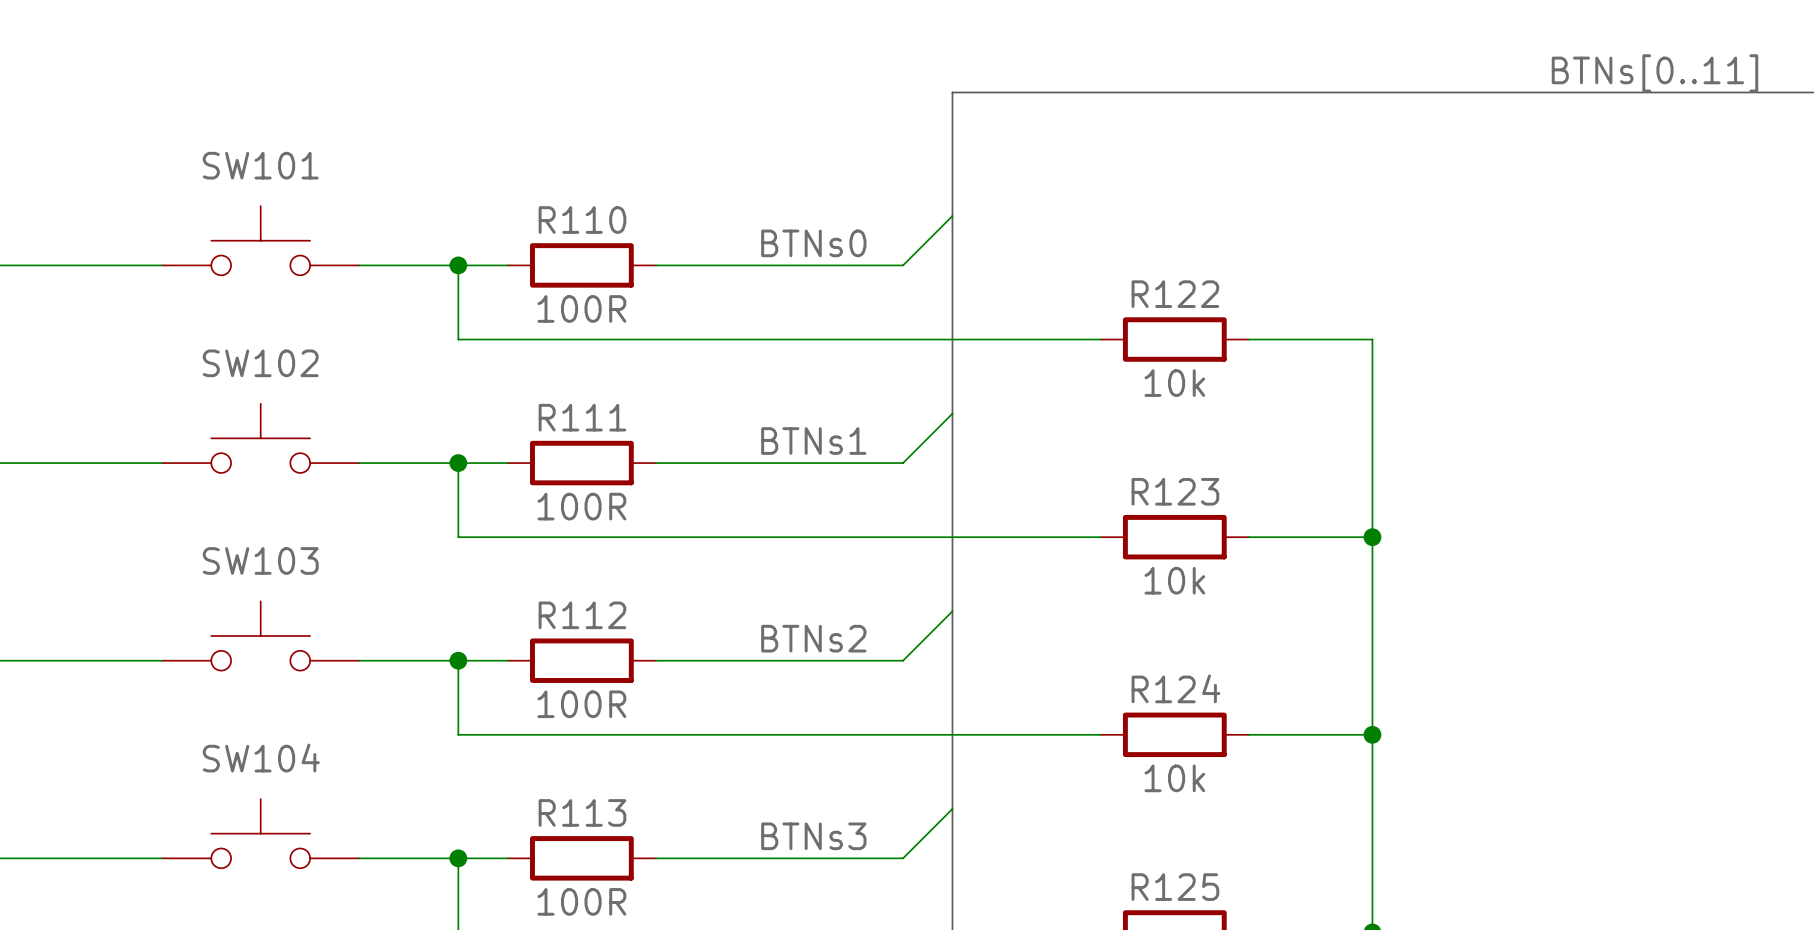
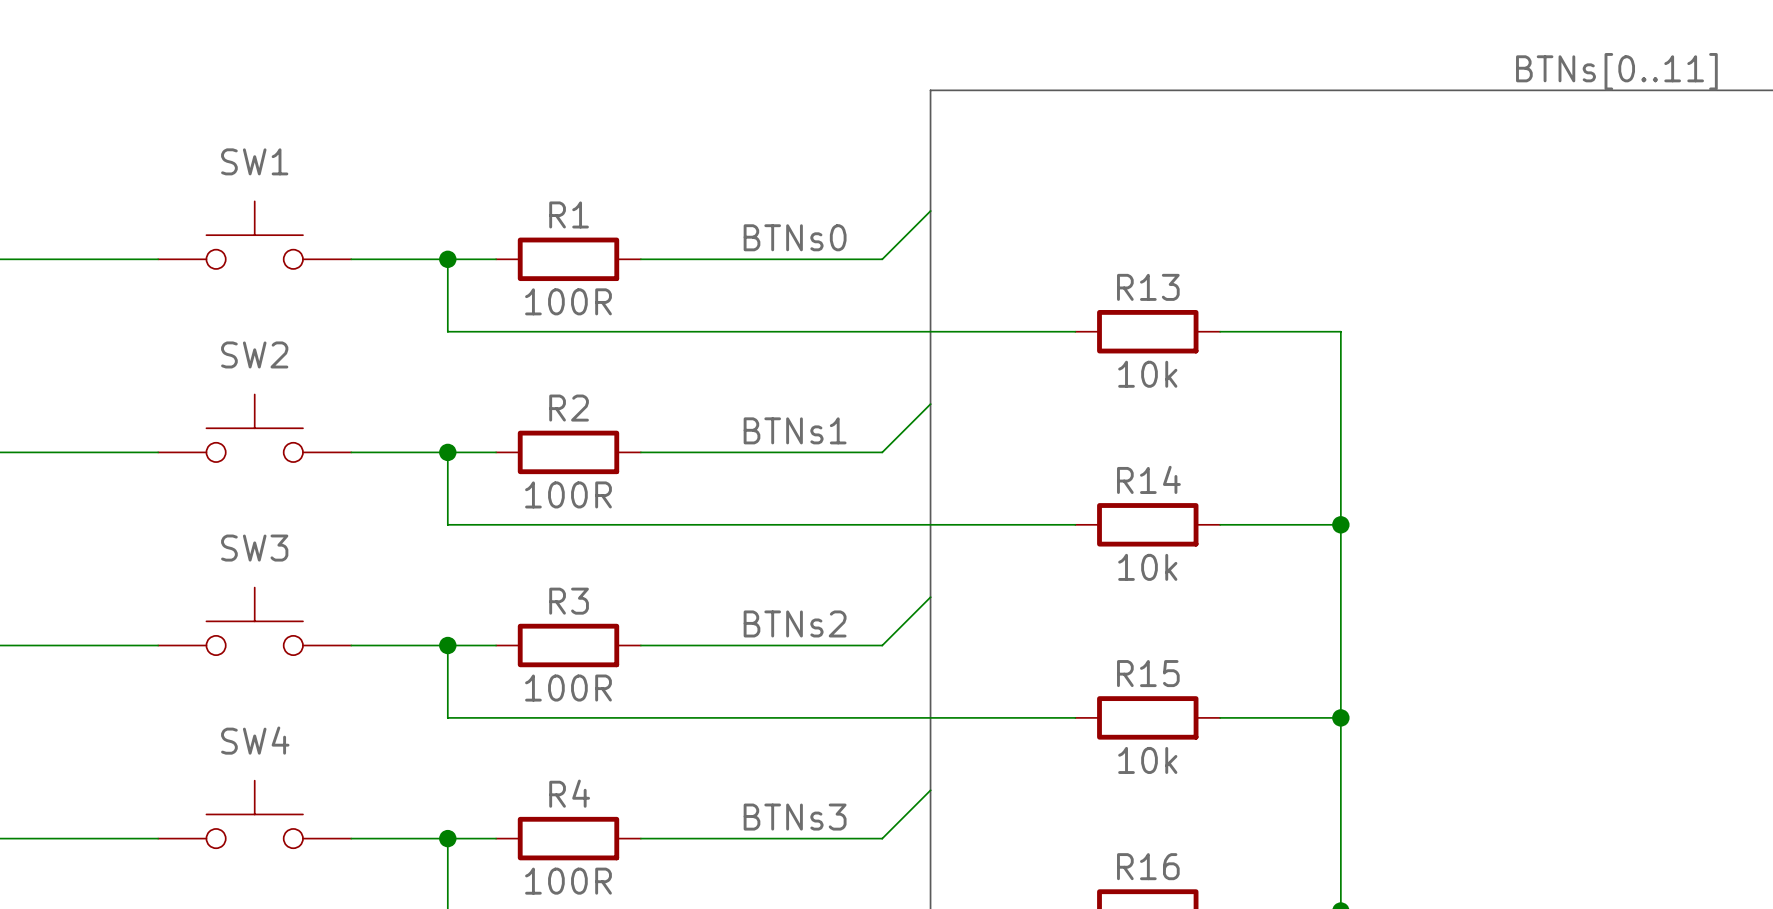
SW101 name: SW101 (260, 165) -> SW1 (254, 161)
R110 name: R110 (582, 220) -> R1 (569, 214)
R122 name: R122 (1175, 294) -> R13 (1148, 287)
SW102 name: SW102 (260, 363) -> SW2 (254, 354)
R111 name: R111 (582, 417) -> R2 (569, 408)
R123 name: R123 (1175, 491) -> R14 (1148, 479)
SW103 name: SW103 (260, 560) -> SW3 (254, 548)
R112 name: R112 (582, 615) -> R3 (569, 601)
R124 name: R124 (1175, 688) -> R15 (1148, 673)
SW104 name: SW104 (261, 758) -> SW4 (255, 740)
R113 name: R113 (582, 812) -> R4 (569, 793)
R125 name: R125 (1175, 887) -> R16 (1148, 866)

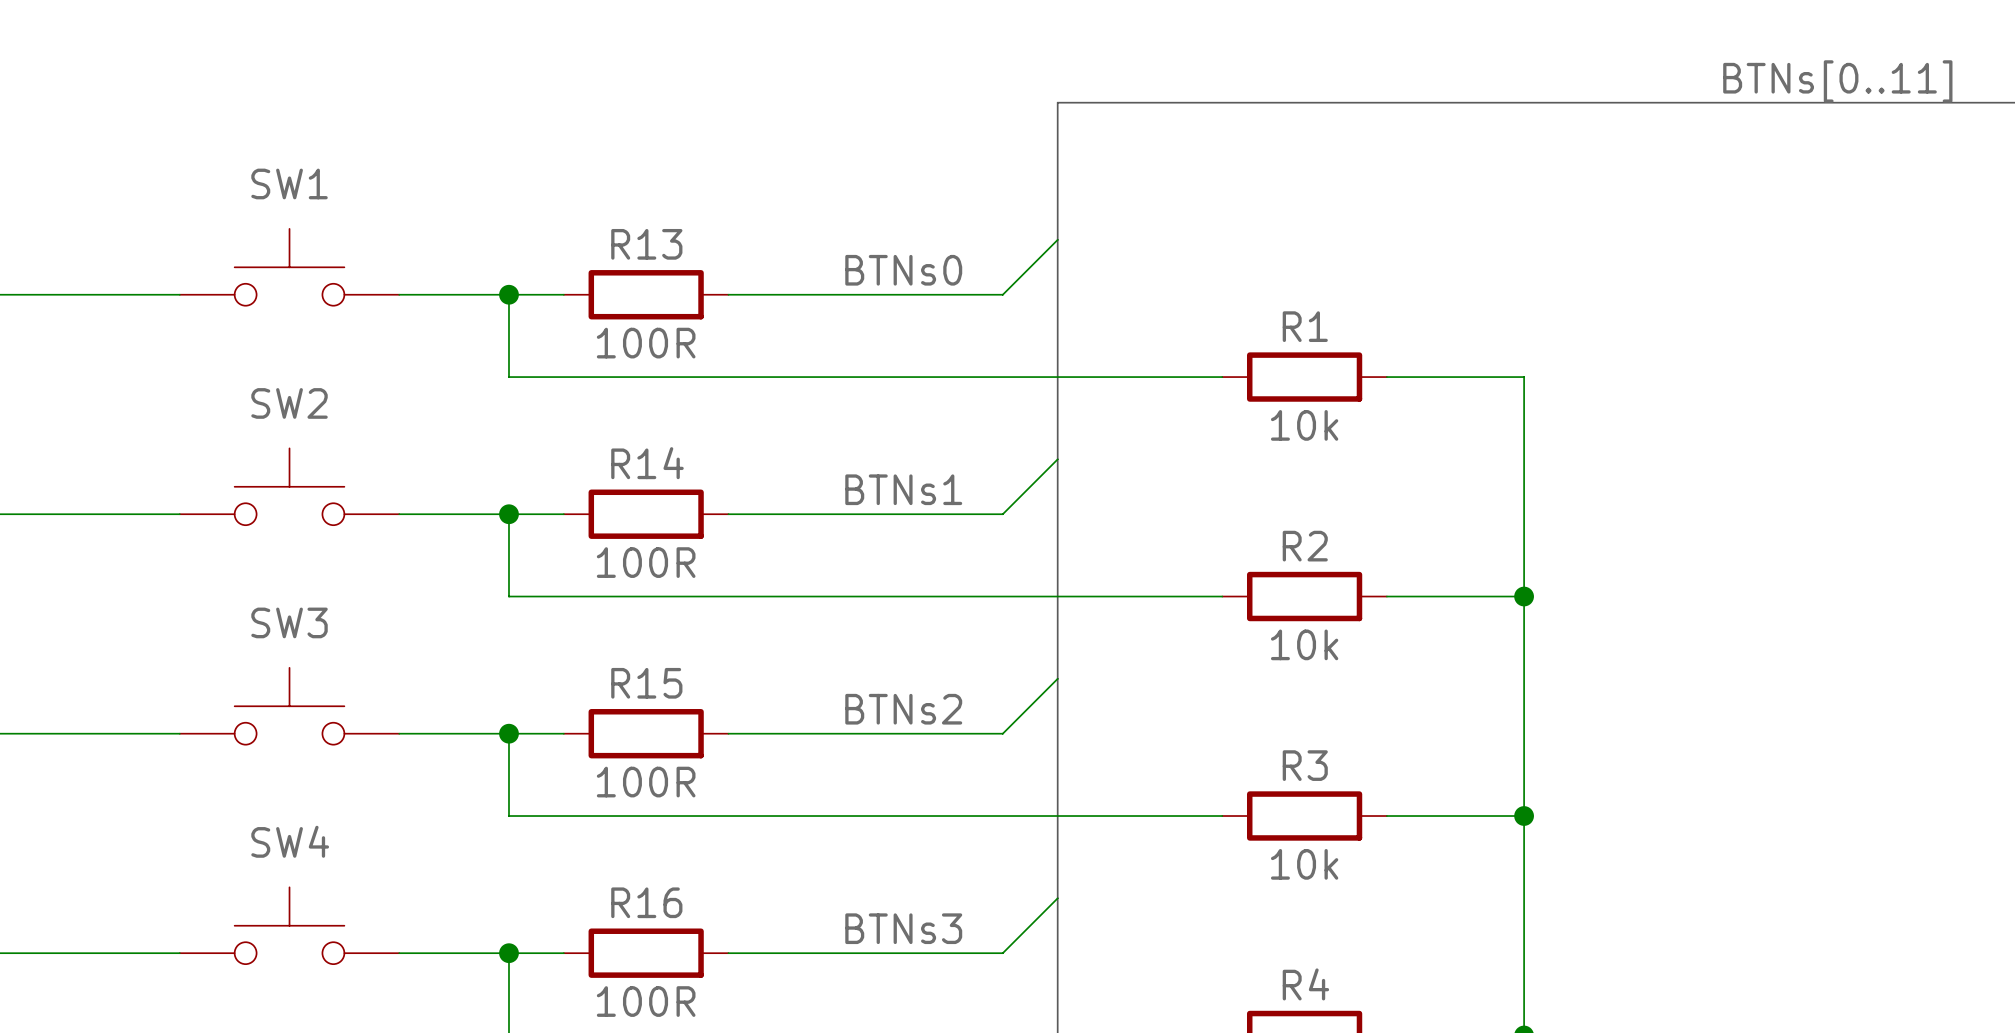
R1 name: R1 (569, 214) -> R13 (646, 244)
R13 name: R13 (1148, 287) -> R1 (1305, 326)
R2 name: R2 (569, 408) -> R14 (647, 463)
R14 name: R14 (1148, 479) -> R2 (1305, 546)
R3 name: R3 (569, 601) -> R15 (646, 683)
R15 name: R15 (1148, 673) -> R3 (1305, 765)
R4 name: R4 (569, 793) -> R16 (646, 902)
R16 name: R16 (1148, 866) -> R4 (1305, 984)

